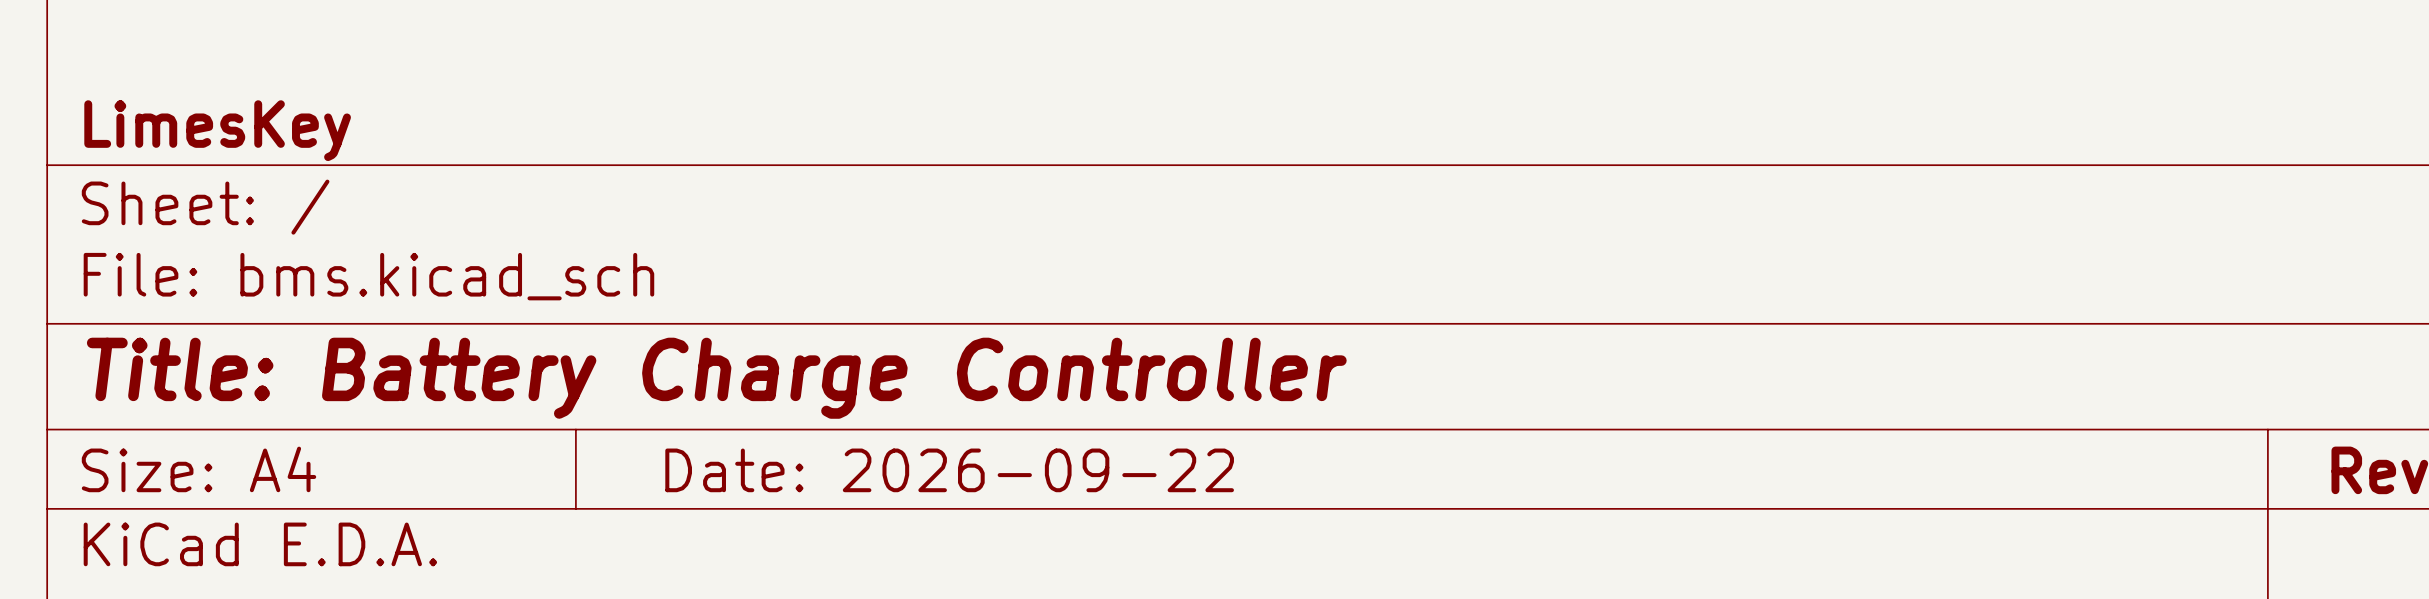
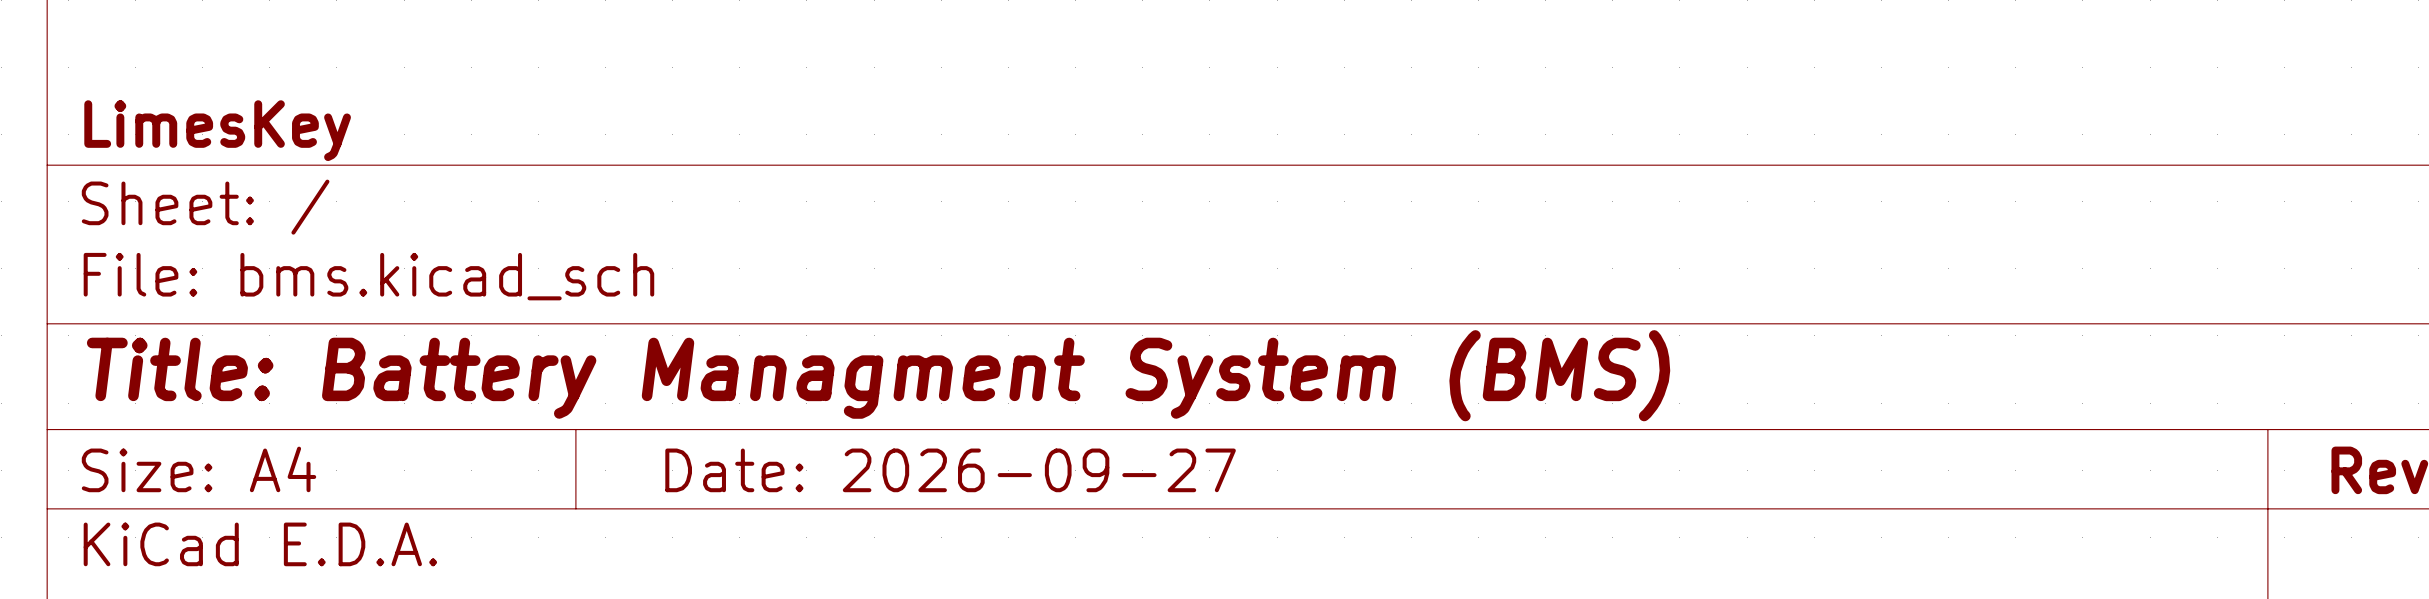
title block: Title: Battery Charge Controller (716, 378) -> Title: Battery Managment System (BMS) (878, 375)
title block: Date: 2026-09-22 (949, 470) -> Date: 2026-09-27 (950, 470)

